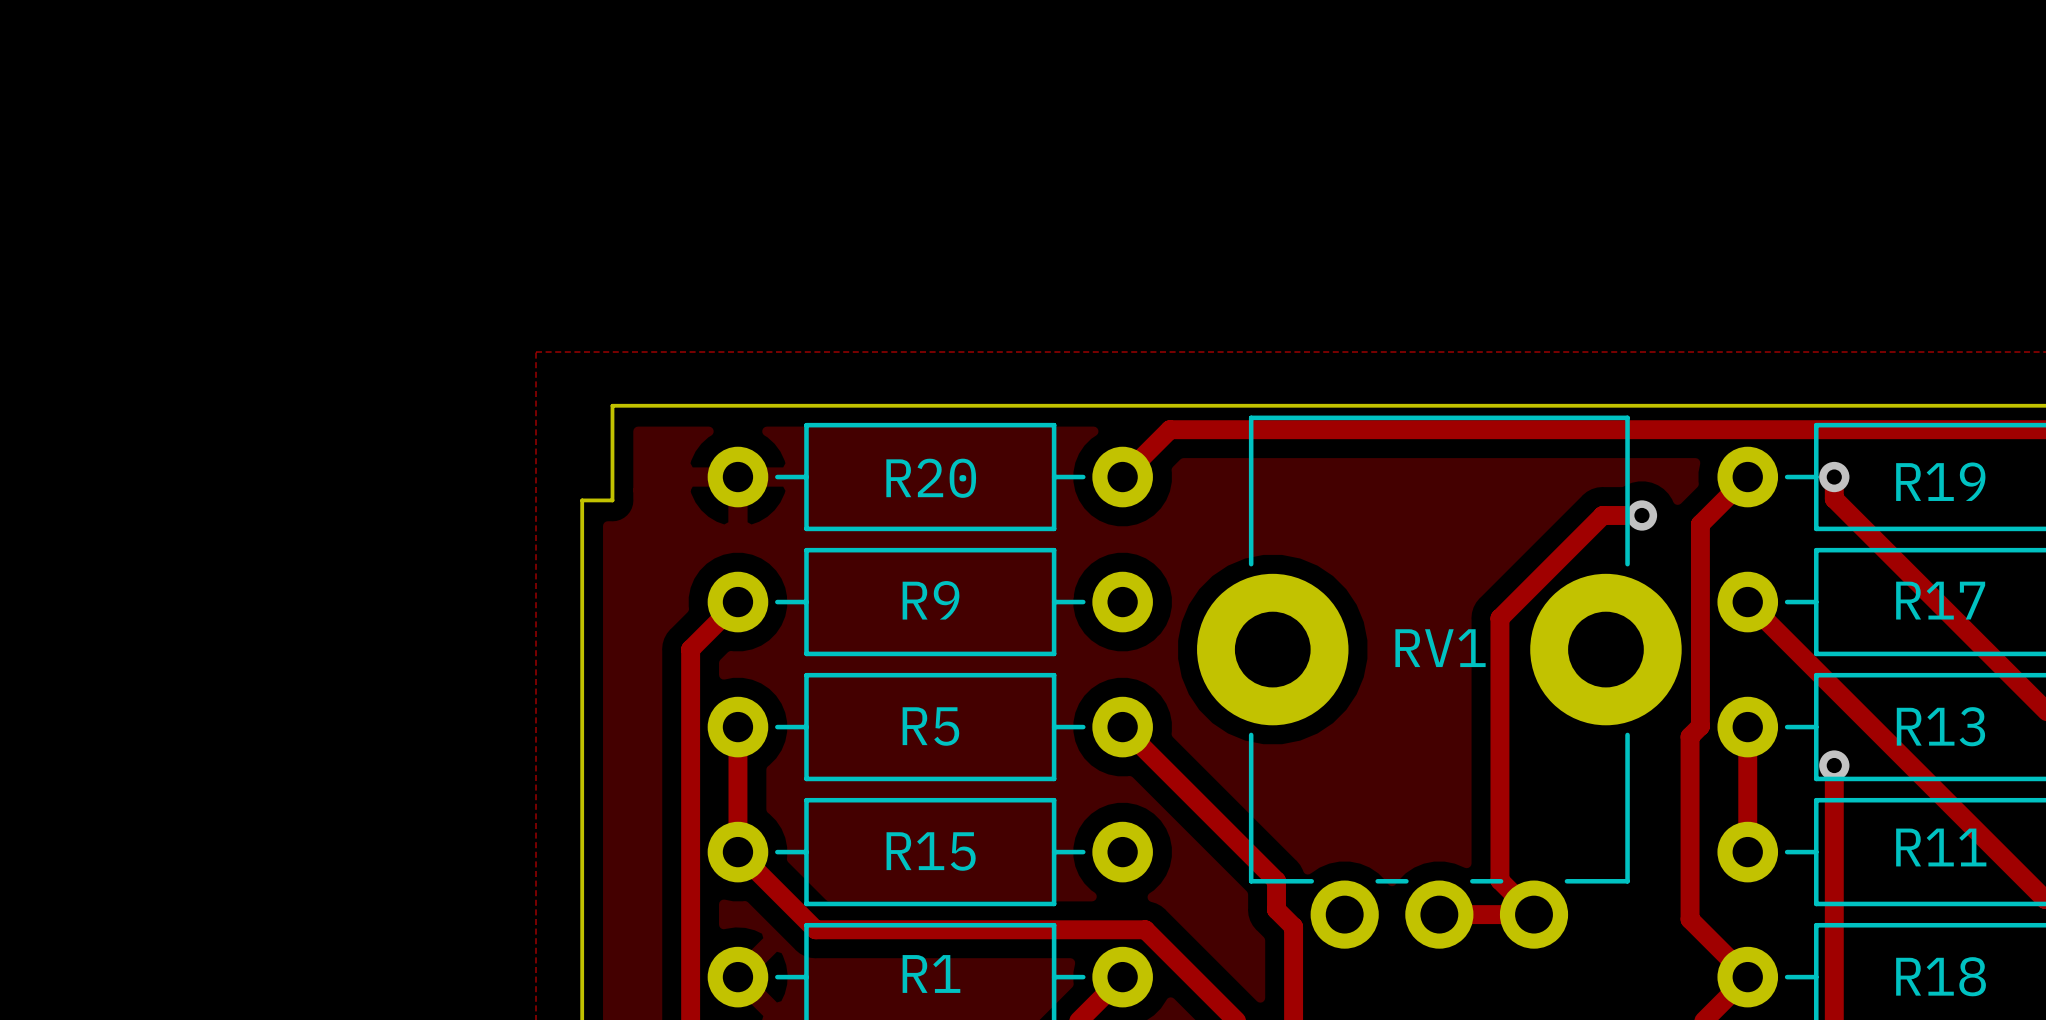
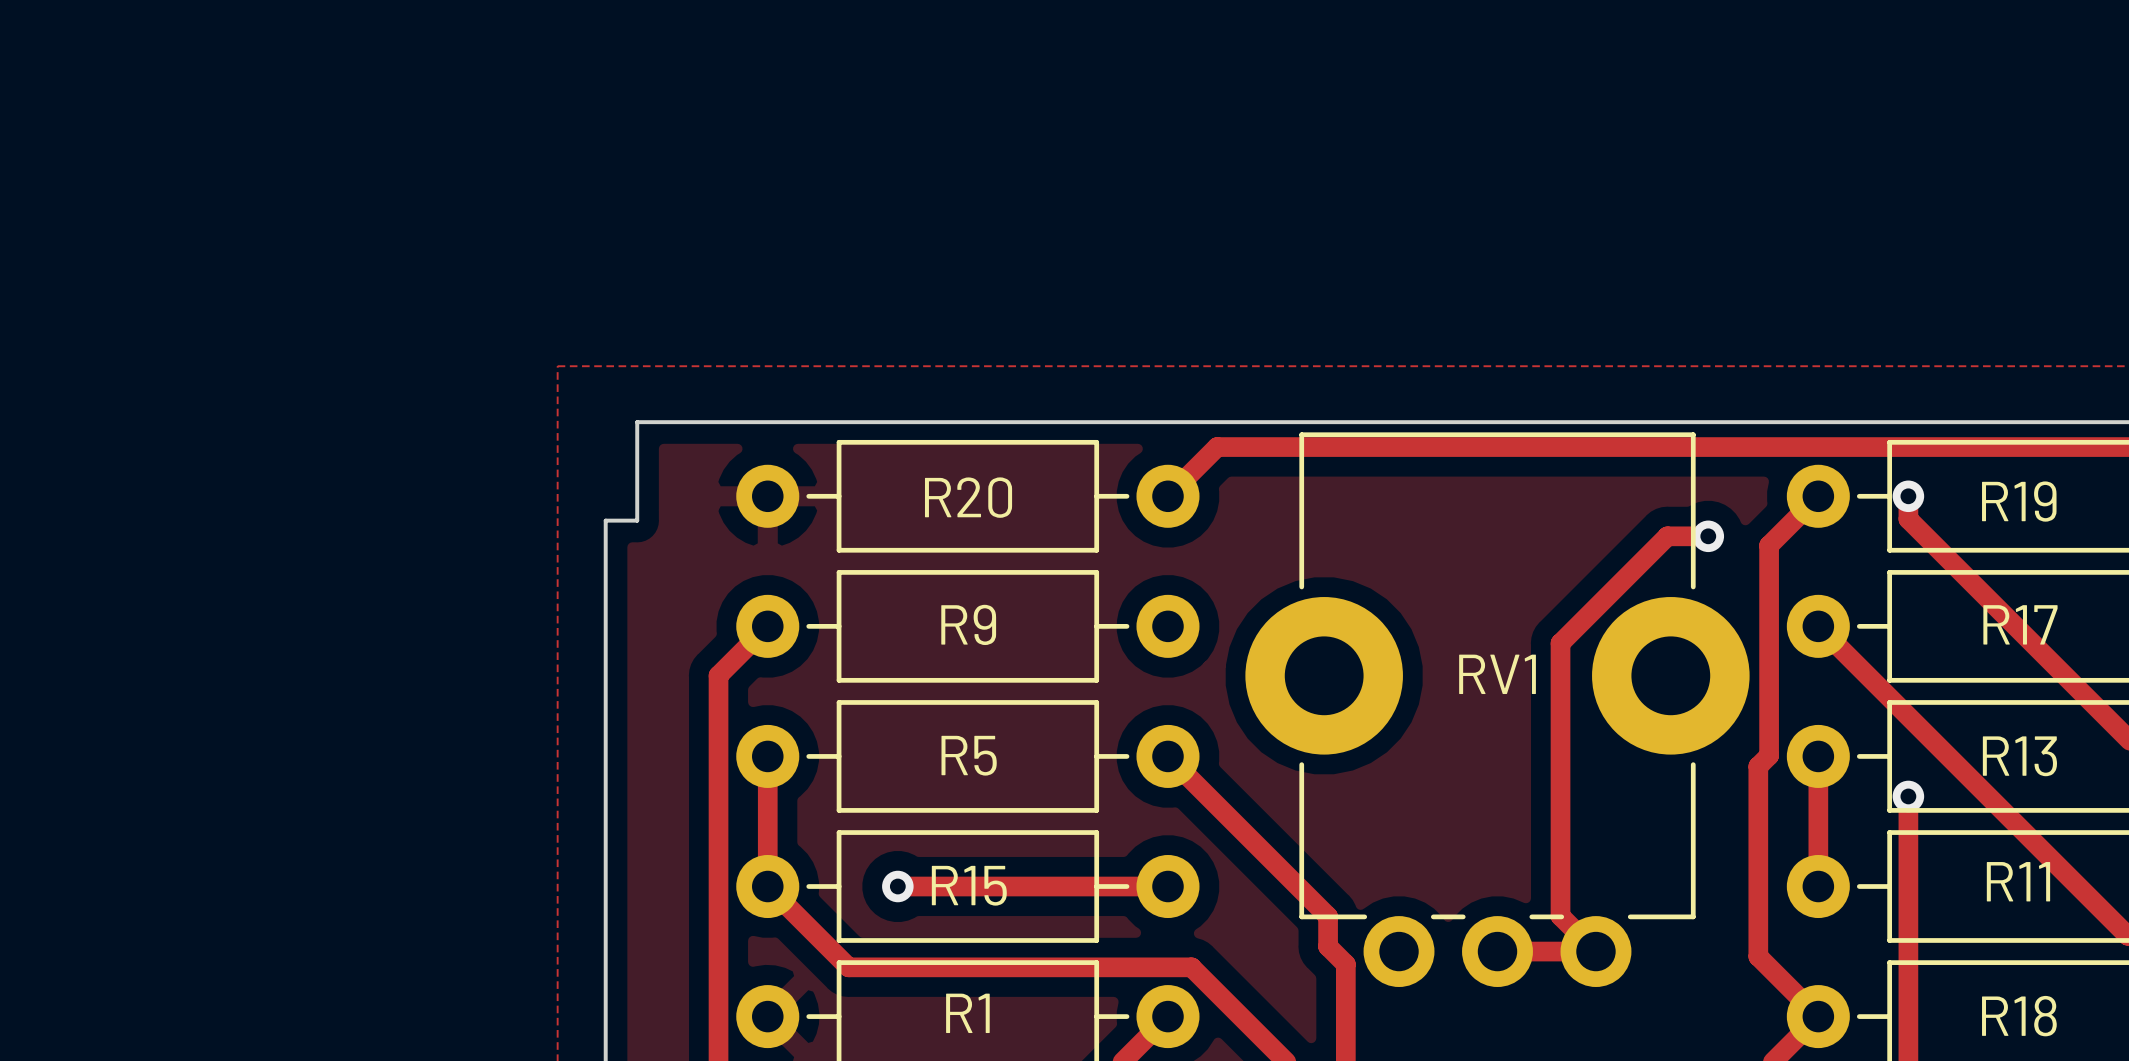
track: none -> (897, 886) (1167, 886)
via: none -> (897, 886)

